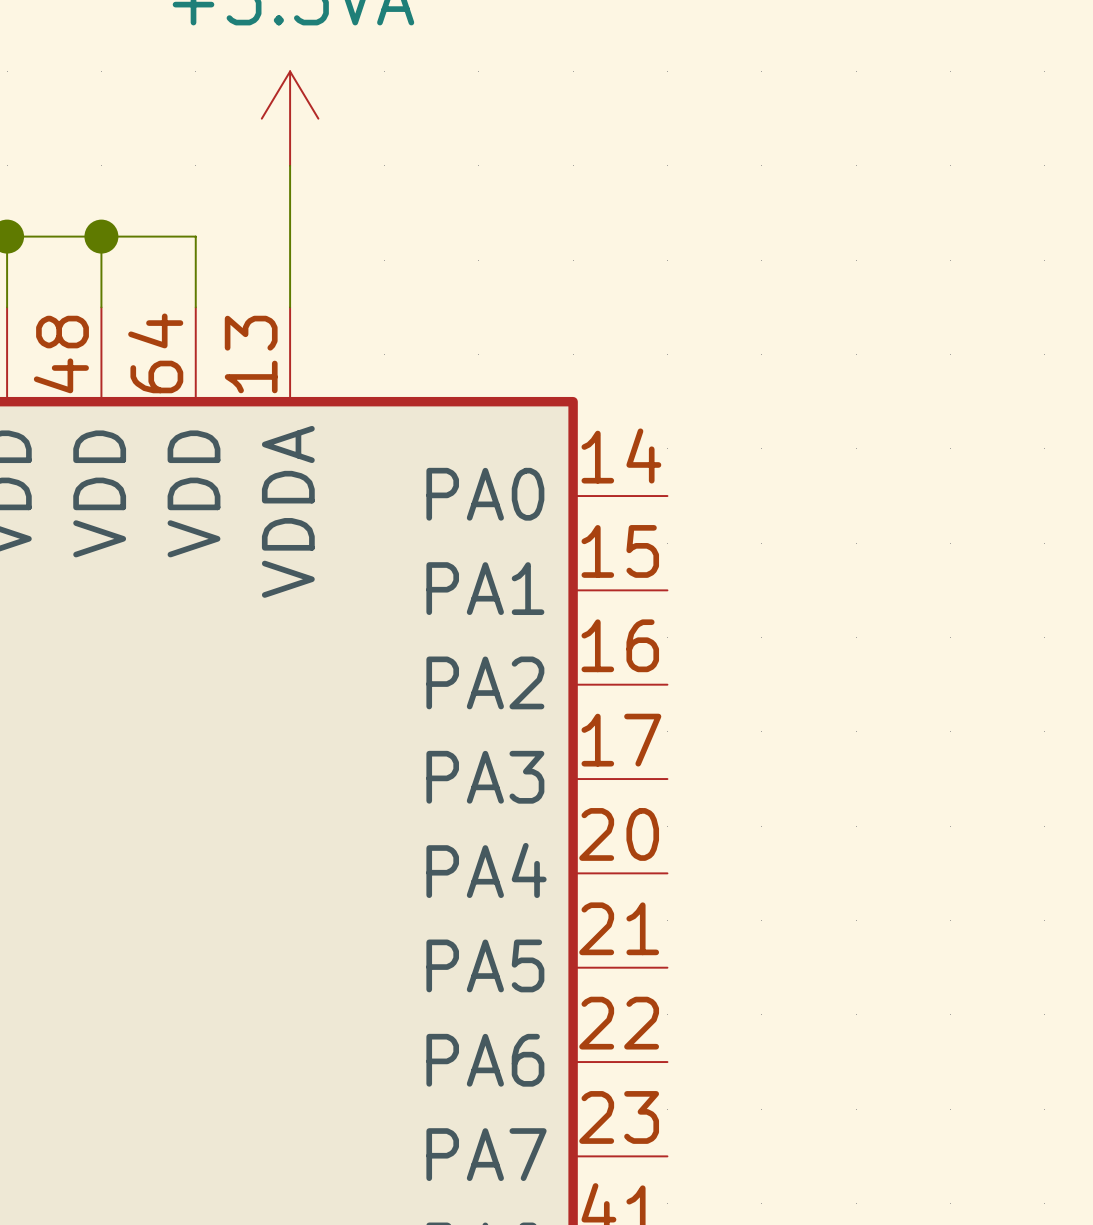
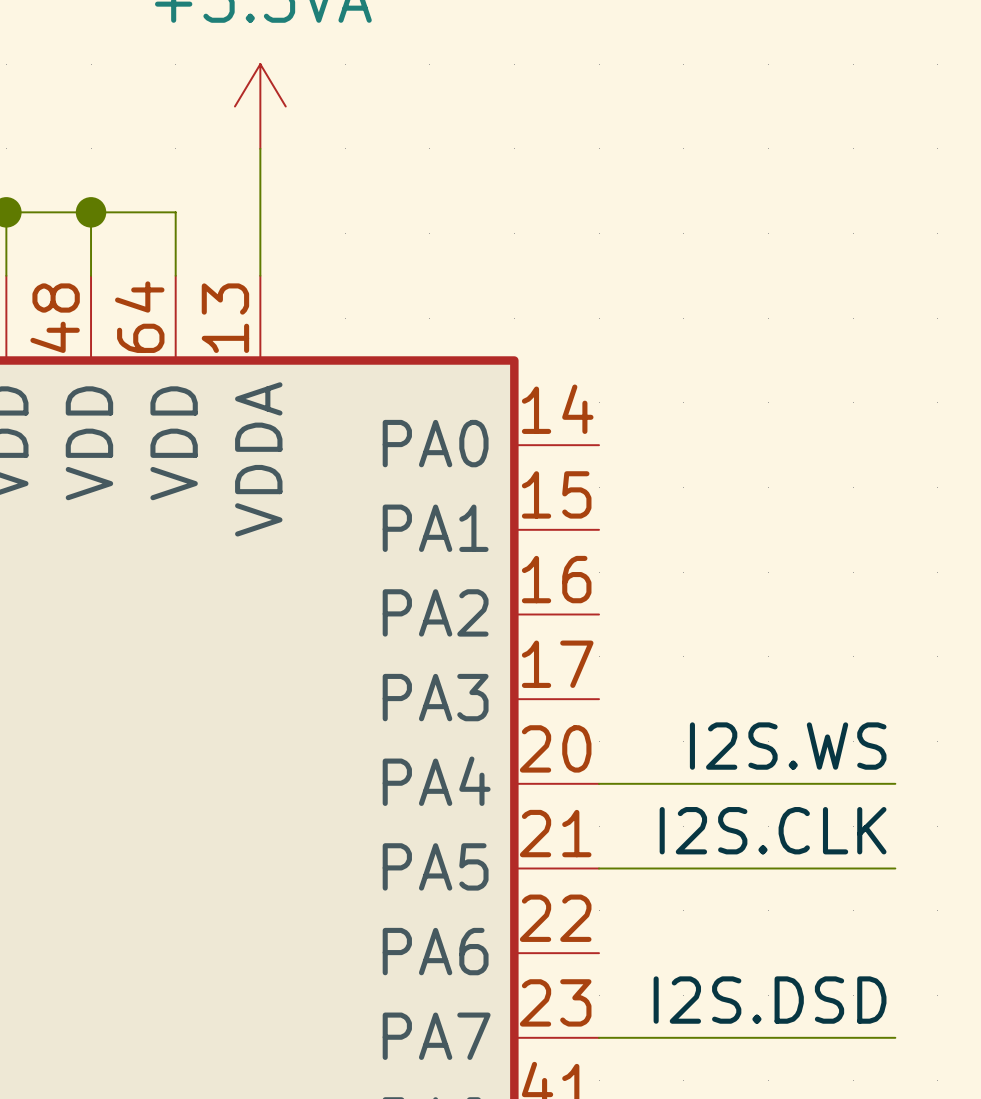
label: none -> I2S.WS (788, 746)
wire: none -> (599, 783) (895, 783)
label: none -> I2S.CLK (773, 830)
wire: none -> (599, 868) (895, 868)
label: none -> I2S.DSD (770, 1000)
wire: none -> (599, 1037) (895, 1037)

